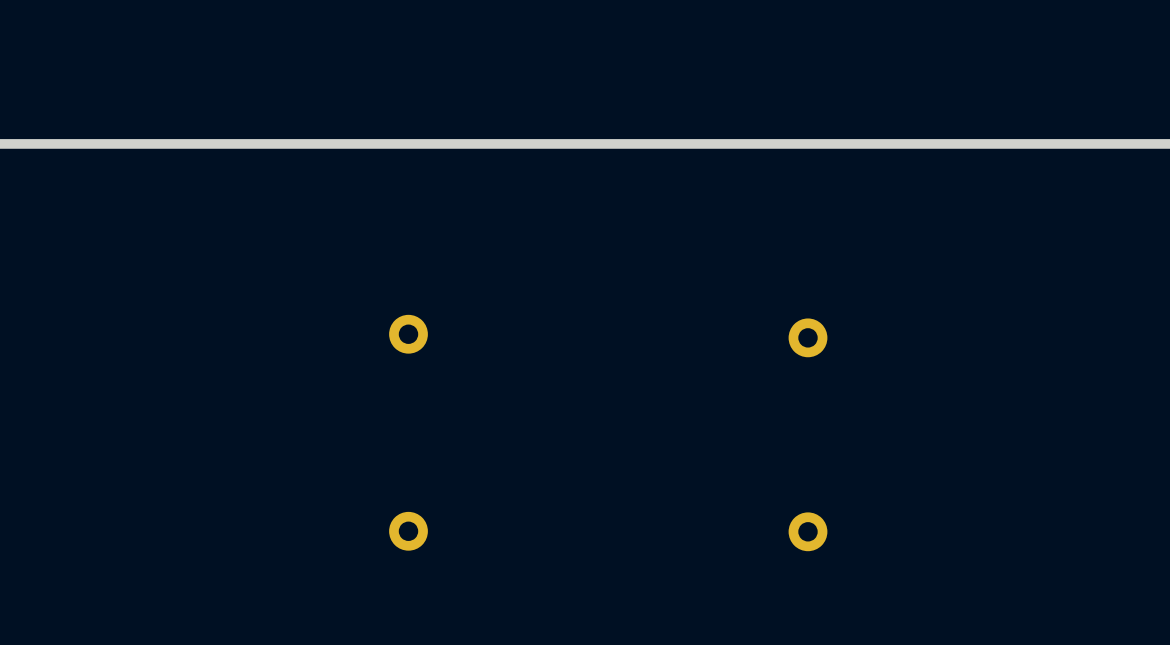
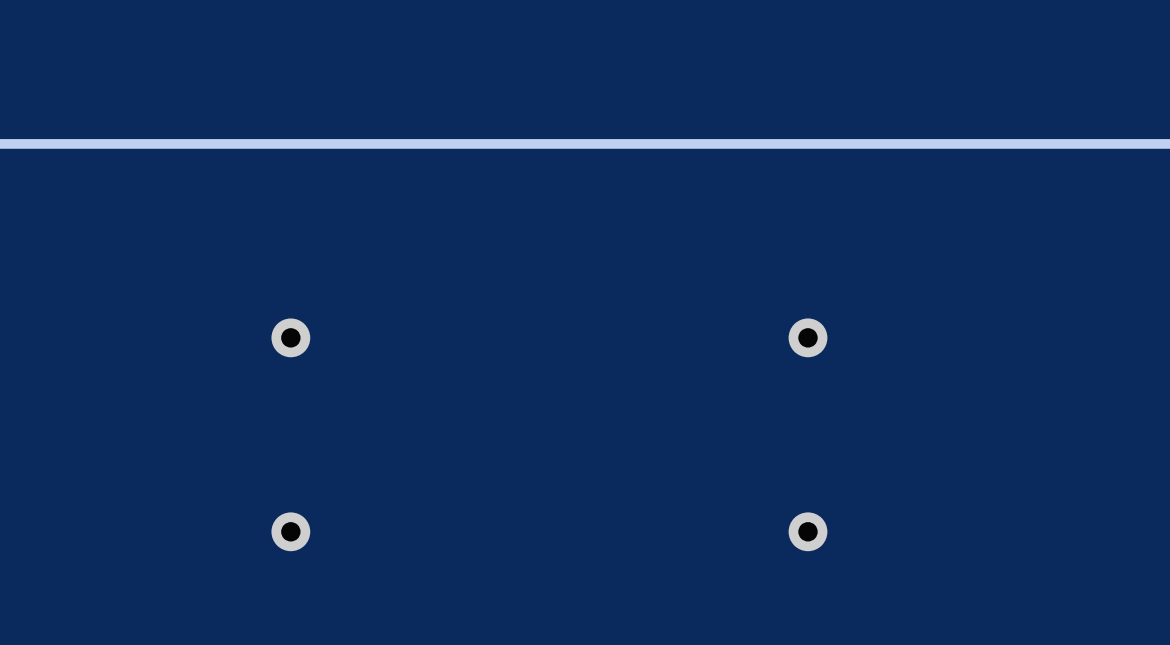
part: (408, 334) -> none
part: none -> (290, 337)
part: none -> (290, 531)
part: (408, 531) -> none

